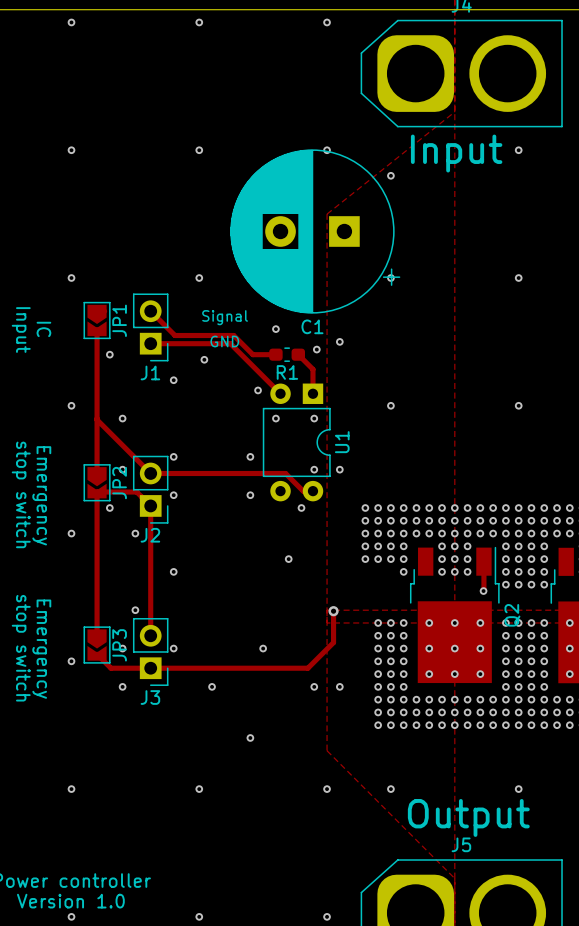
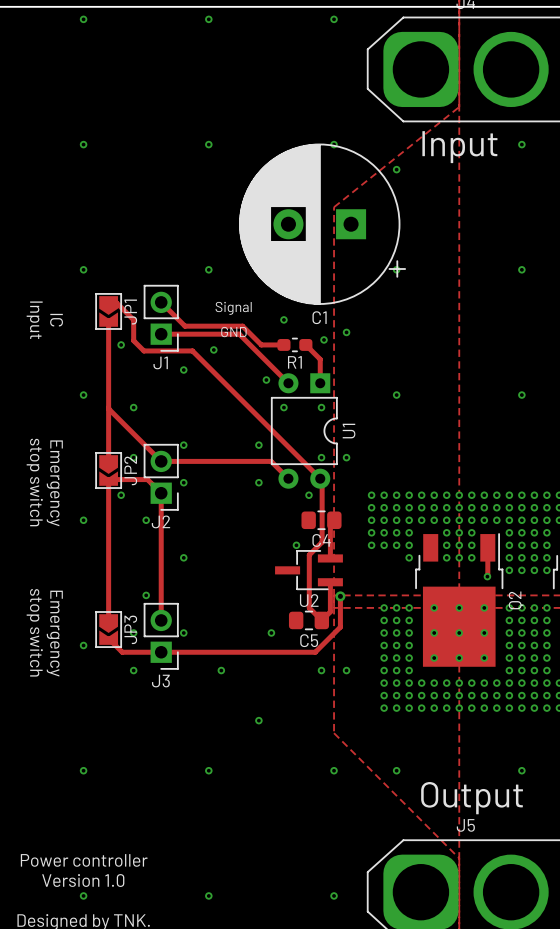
track: none -> (116, 302) (133, 319) (133, 340) (143, 350) (192, 350) (320, 478)
track: (262, 473) (285, 473) (303, 491) (312, 491) -> (271, 461) (288, 478)
track: none -> (322, 480) (322, 542) (309, 555) (309, 607) (321, 620) (330, 611) (330, 582)
C4: none -> (321, 520)
track: none -> (334, 520) (330, 524) (330, 558)
U2: none -> (308, 570)
C5: none -> (308, 620)

